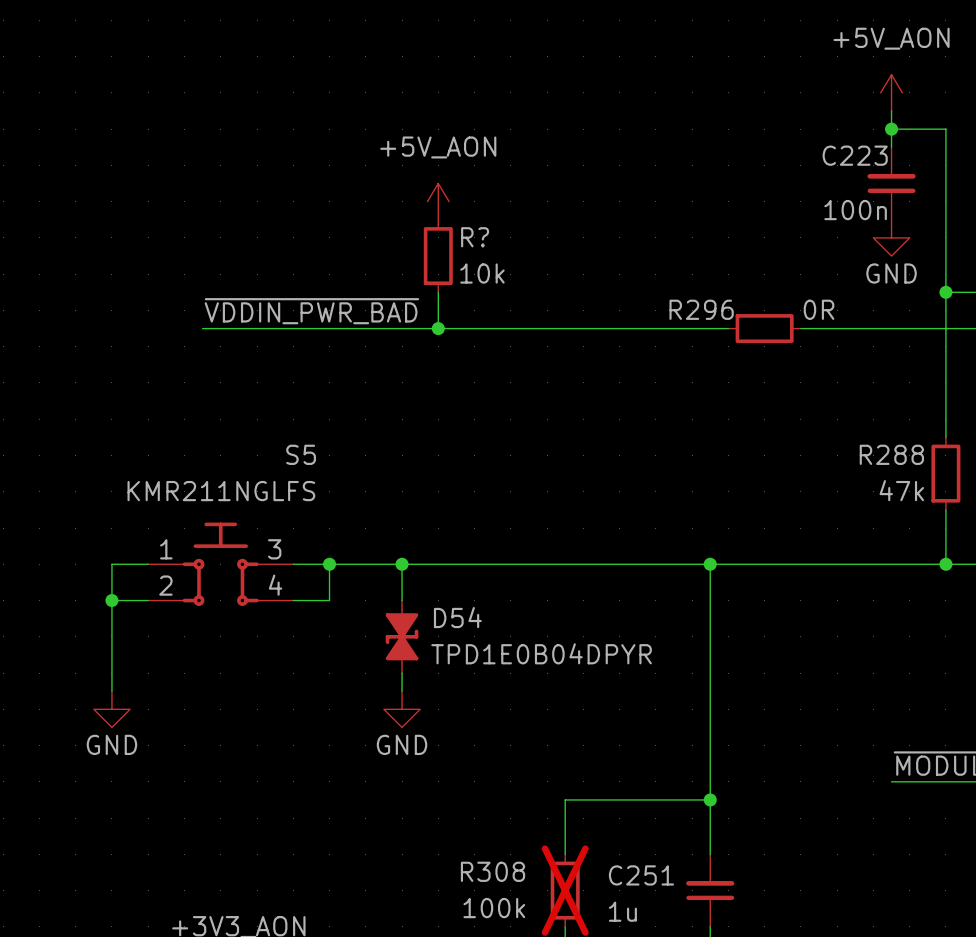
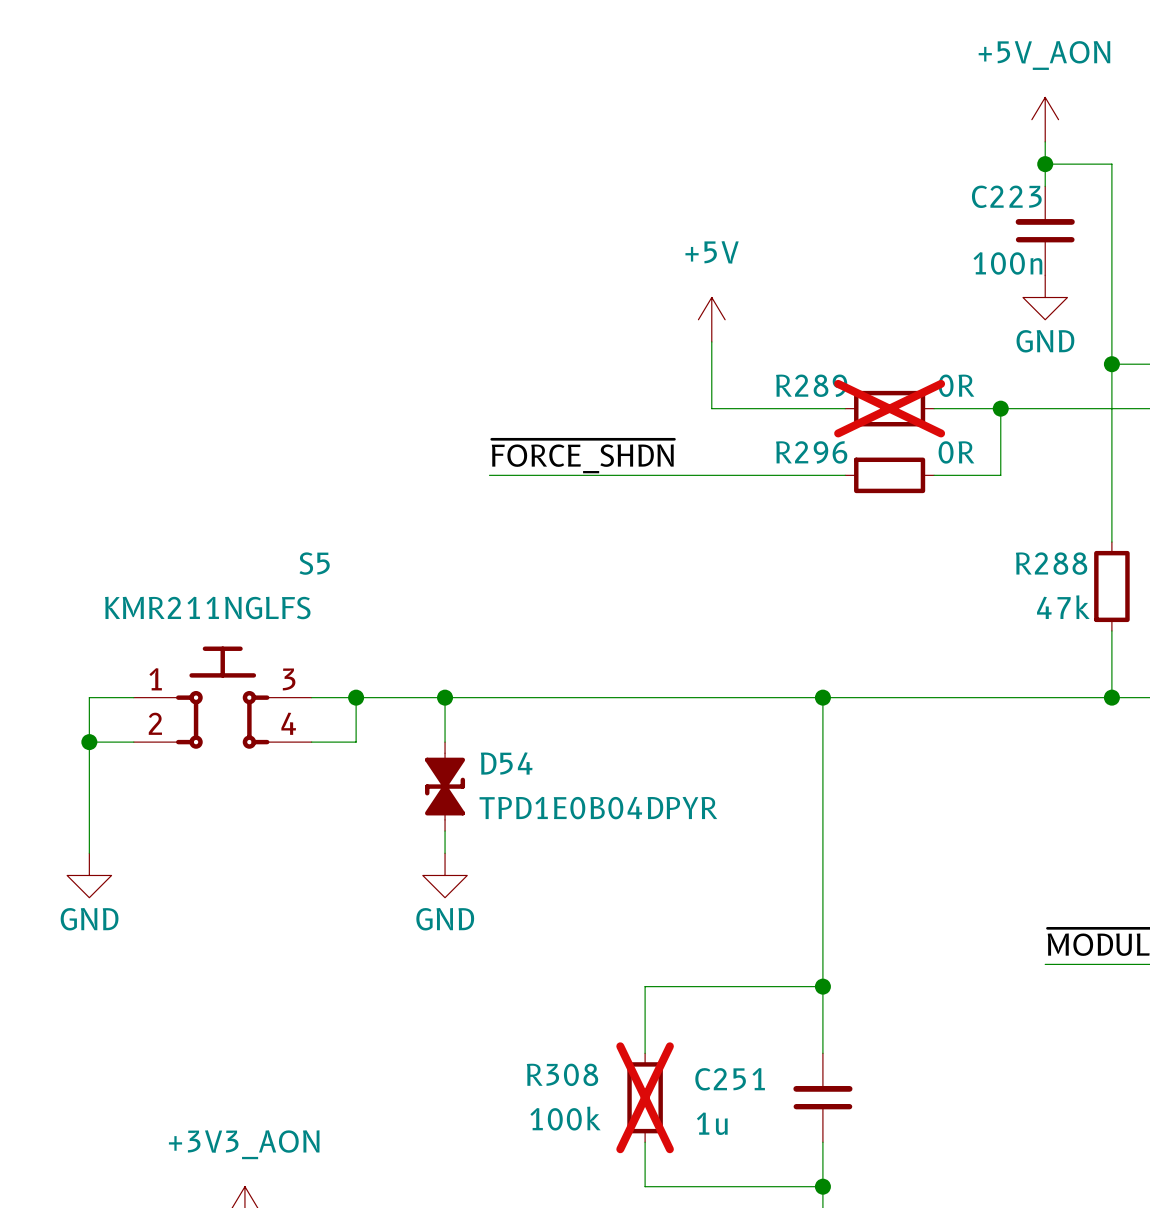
power symbol: +5V_AON (438, 201) -> none
R?: (438, 256) -> none
power symbol: none -> +5V (711, 319)
wire: (438, 292) (438, 328) -> none
R296 name: R296 (701, 309) -> R289 (811, 385)
label: ~{VDDIN_PWR_BAD} (311, 311) -> none
wire: (202, 328) (619, 328) -> (711, 341) (711, 408)
junction: (438, 328) -> none
R296 do-not-place cross: none -> (889, 408)
wire: none -> (1000, 408) (1000, 475) (934, 475)
junction: none -> (1000, 408)
label: none -> ~{FORCE_SHDN} (583, 456)
wire: none -> (489, 475) (845, 475)
R296: none -> (889, 475)

